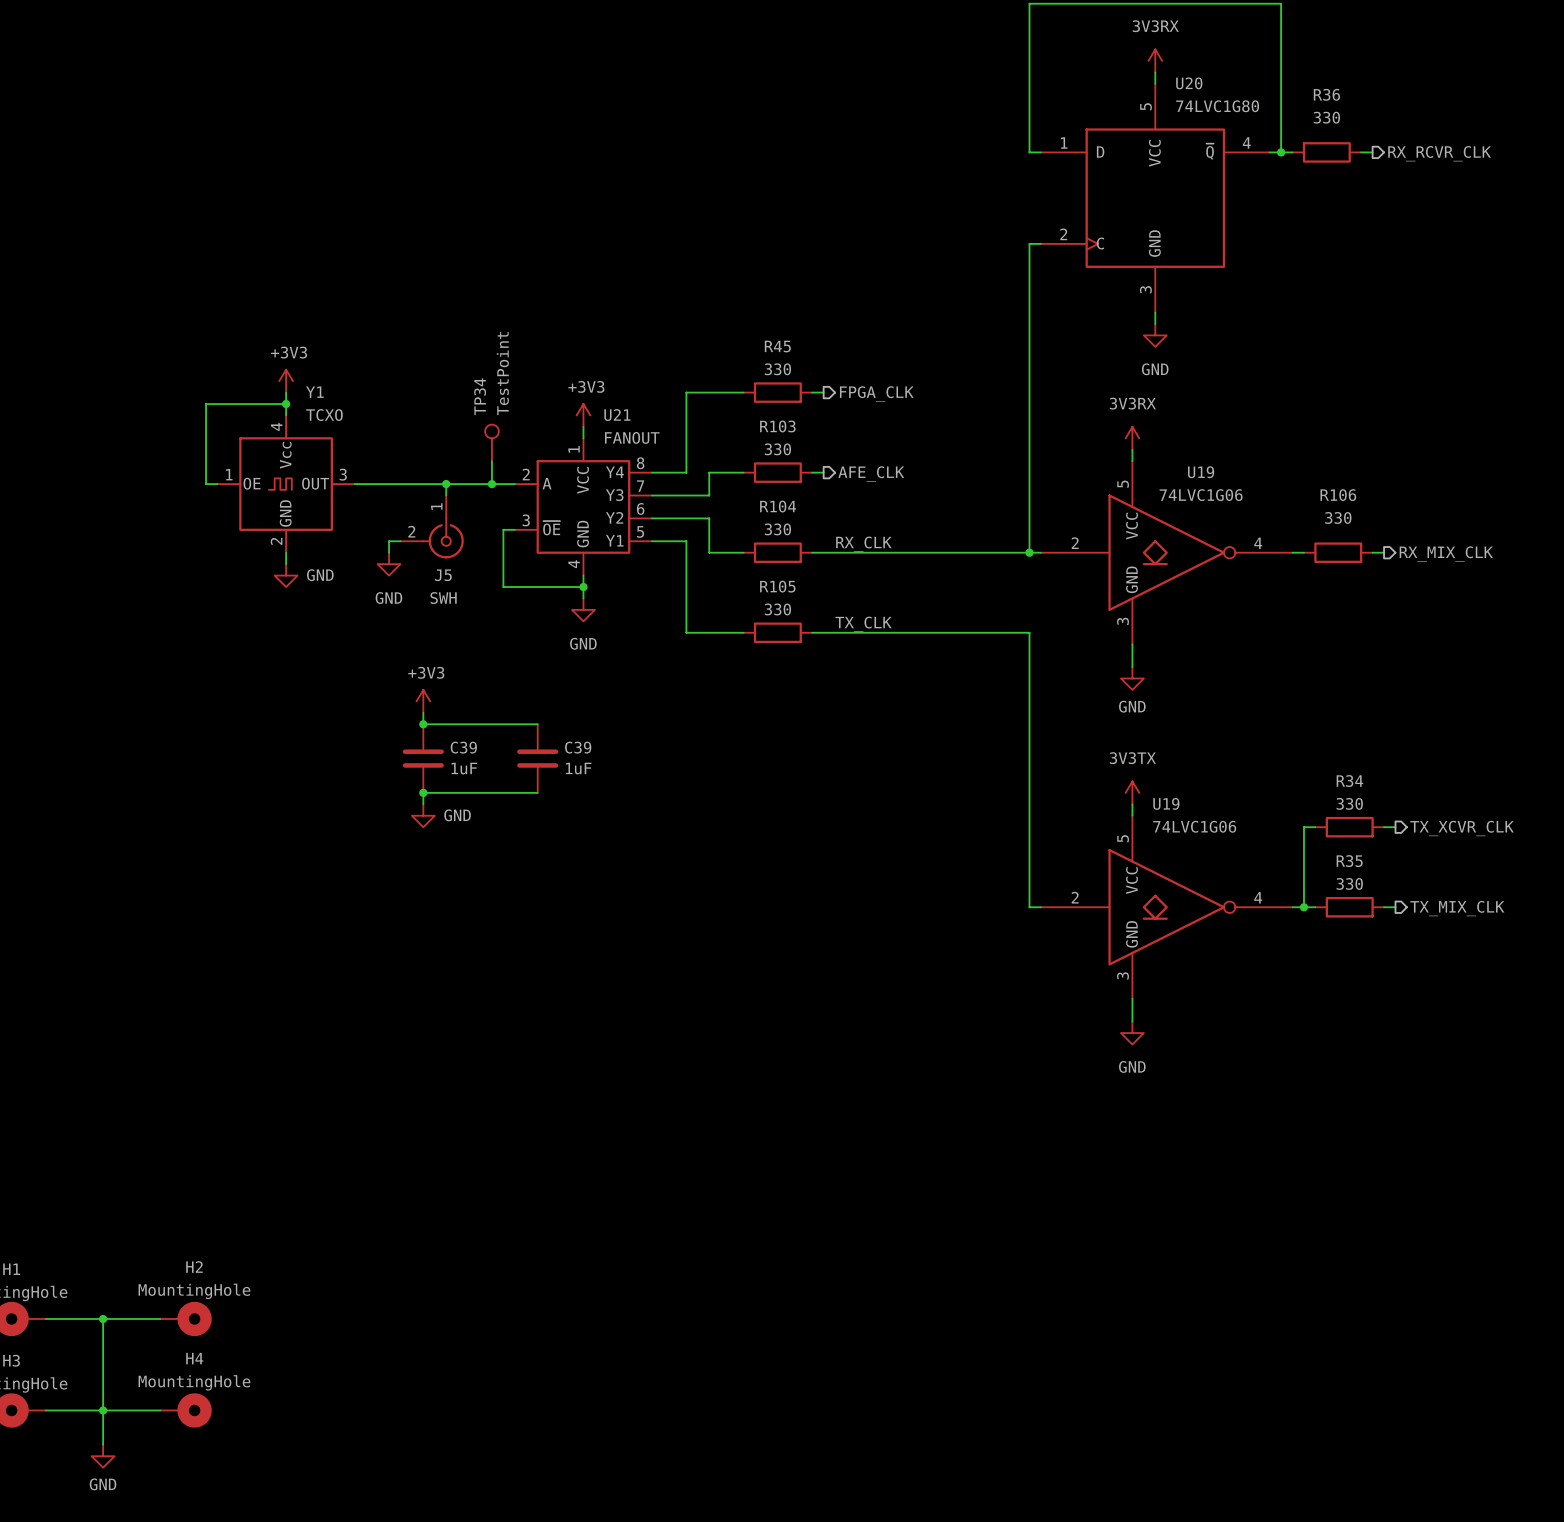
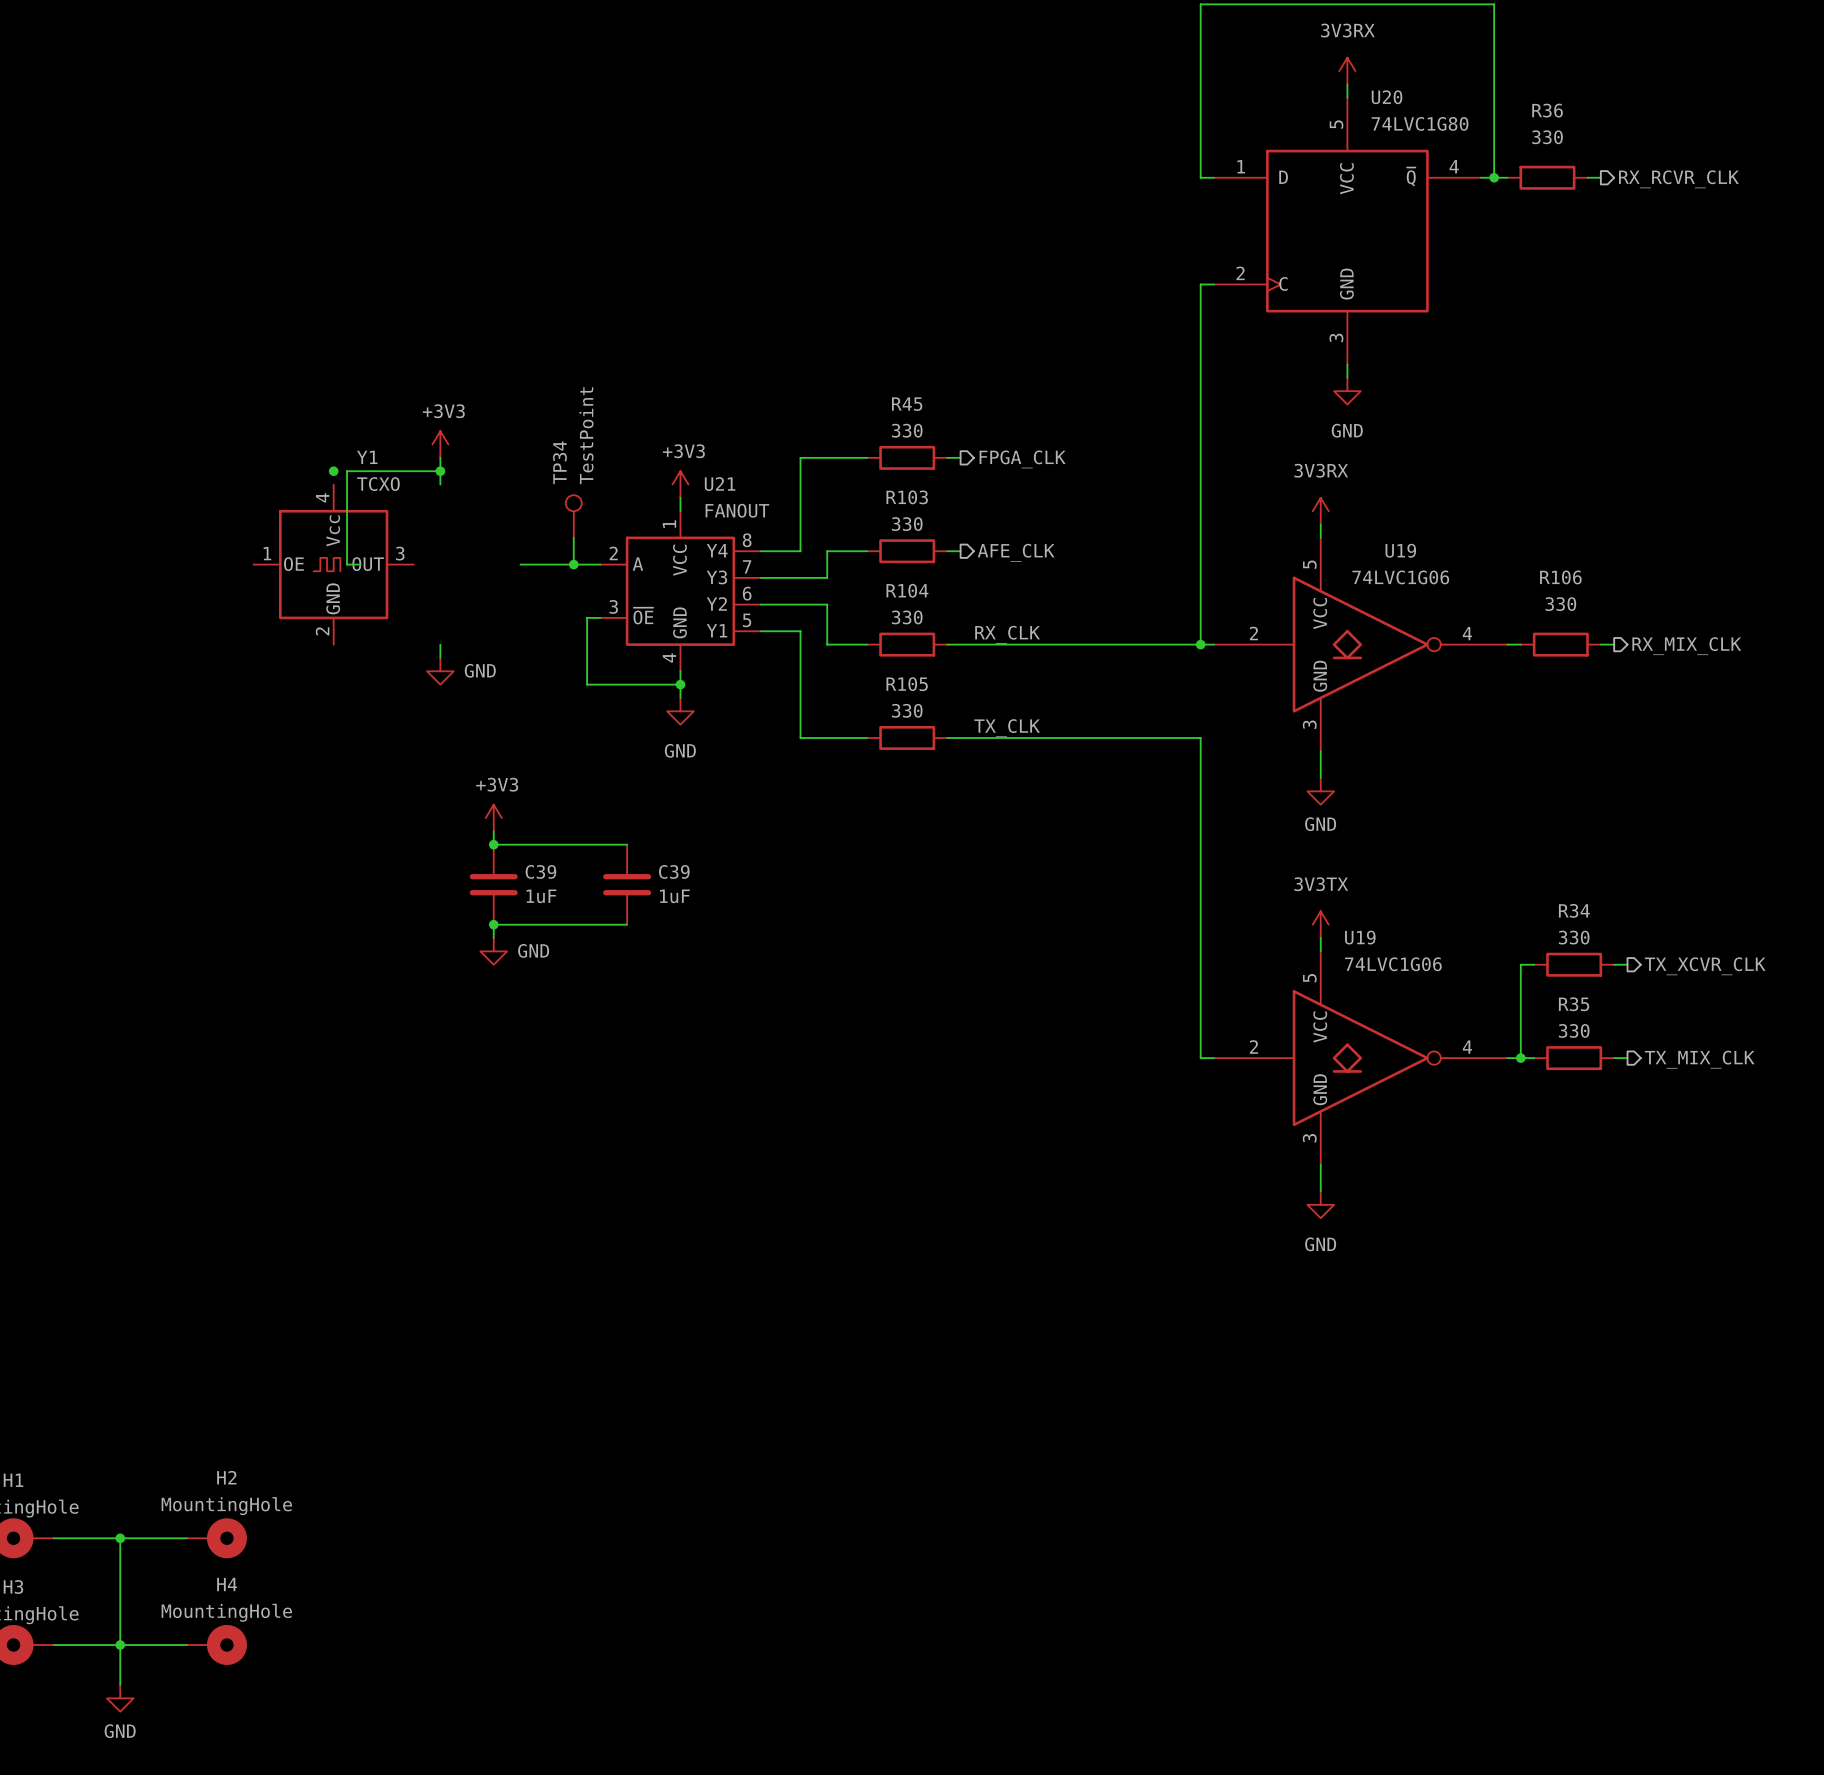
power symbol position: +3V3 (286, 381) -> +3V3 (440, 444)
wire: (286, 392) (286, 415) -> (440, 457) (440, 484)
wire: (286, 404) (206, 404) (206, 484) (217, 484) -> (440, 471) (347, 471) (347, 564) (360, 564)
junction: none -> (440, 471)
wire: (354, 484) (446, 484) (446, 495) -> none
junction: (446, 484) -> none
J5: SWH (432, 526) -> none
wire: (400, 541) (389, 541) (389, 552) -> none
wire: (286, 552) (286, 564) -> (440, 644) (440, 657)
power symbol position: GND (389, 564) -> GND (440, 671)
power symbol: GND (286, 575) -> none
power symbol text position: GND (388, 598) -> GND (480, 670)

